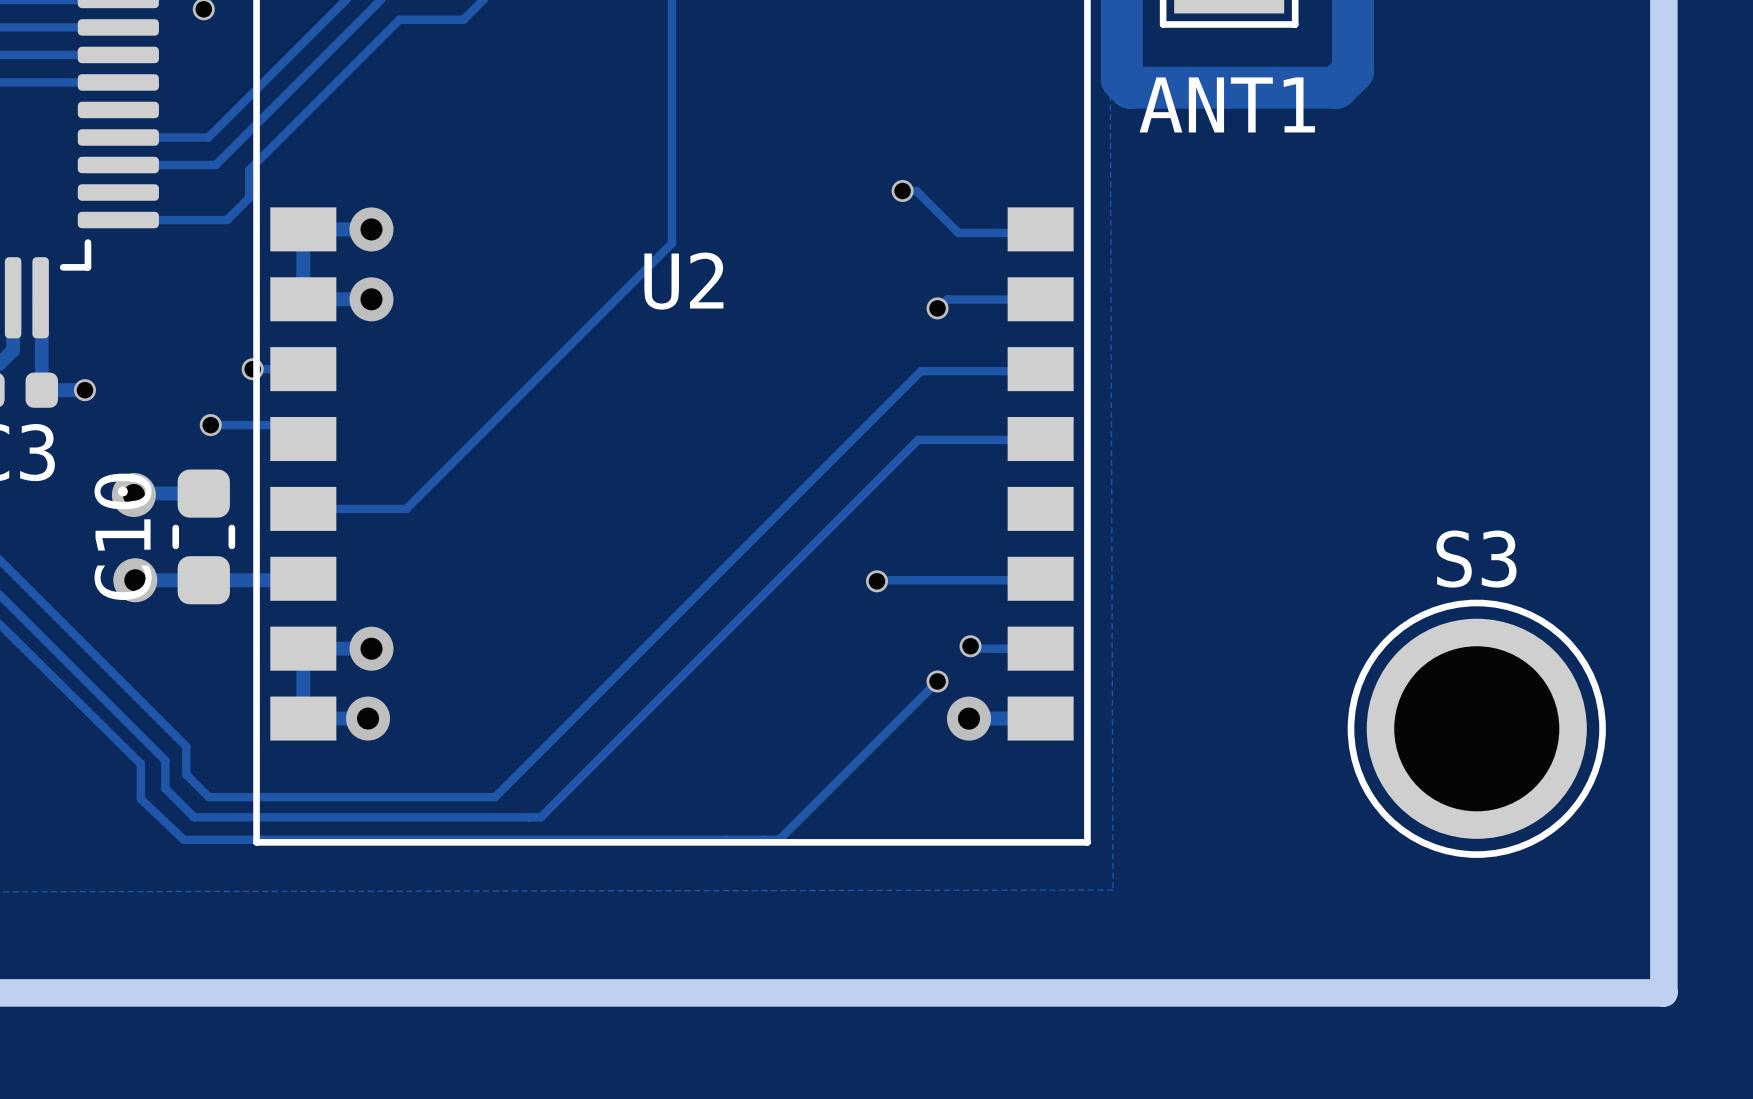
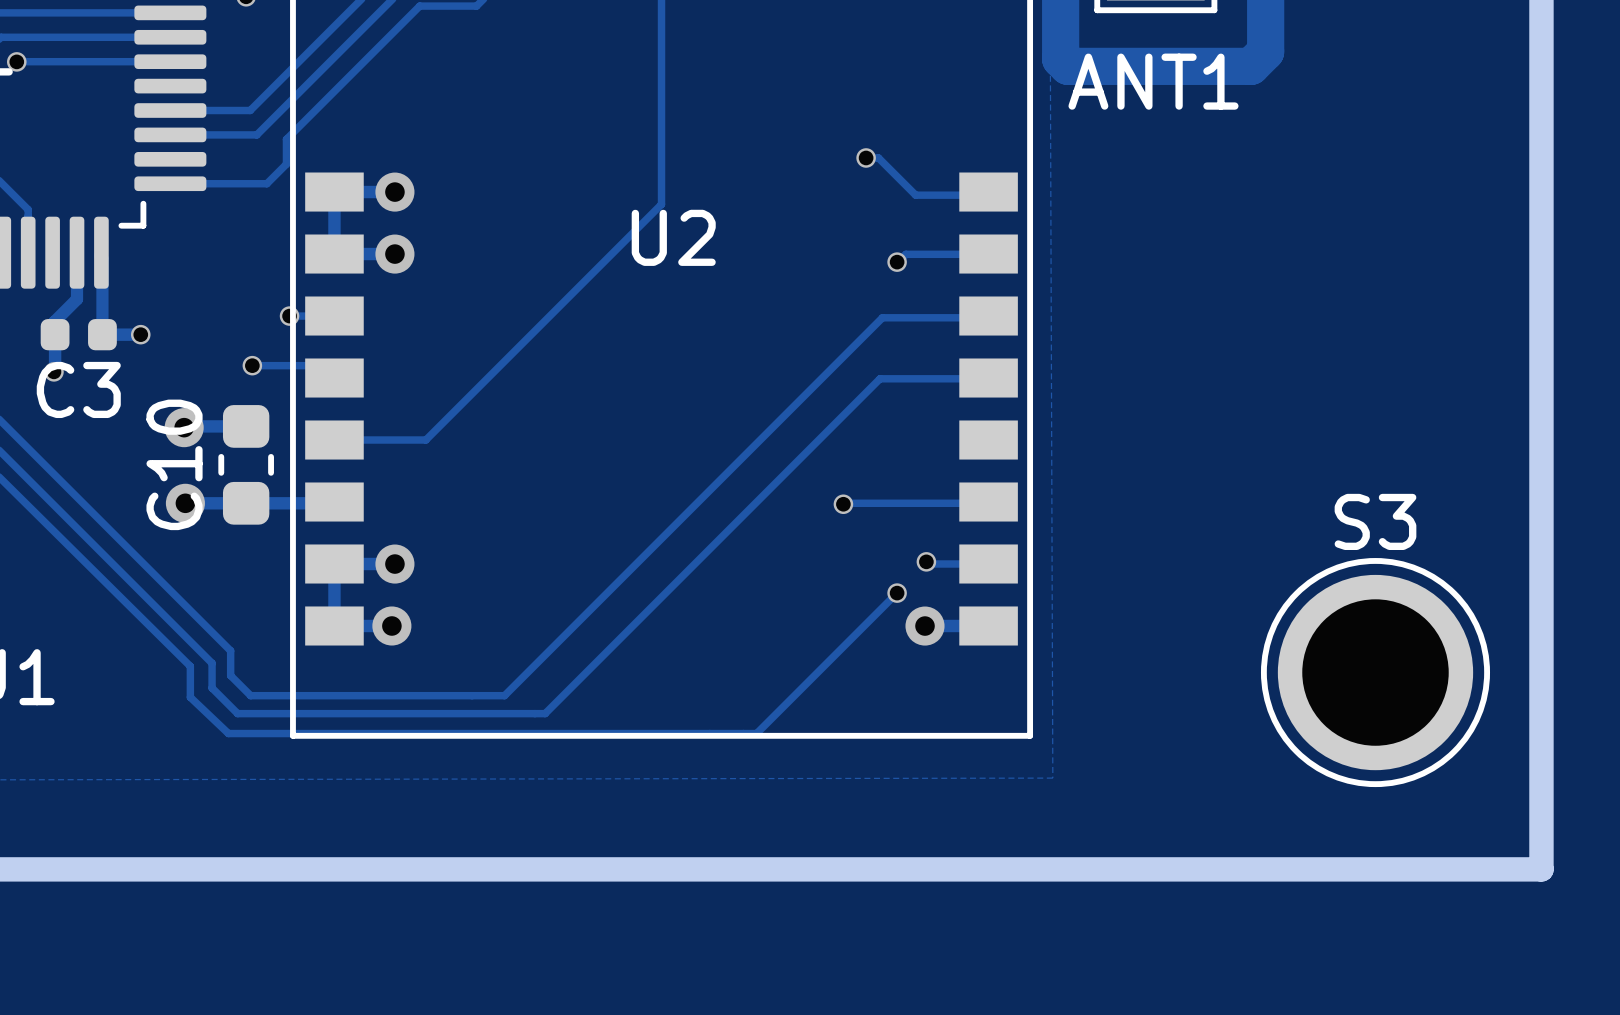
S3 position: (1476, 728) -> (1375, 672)

